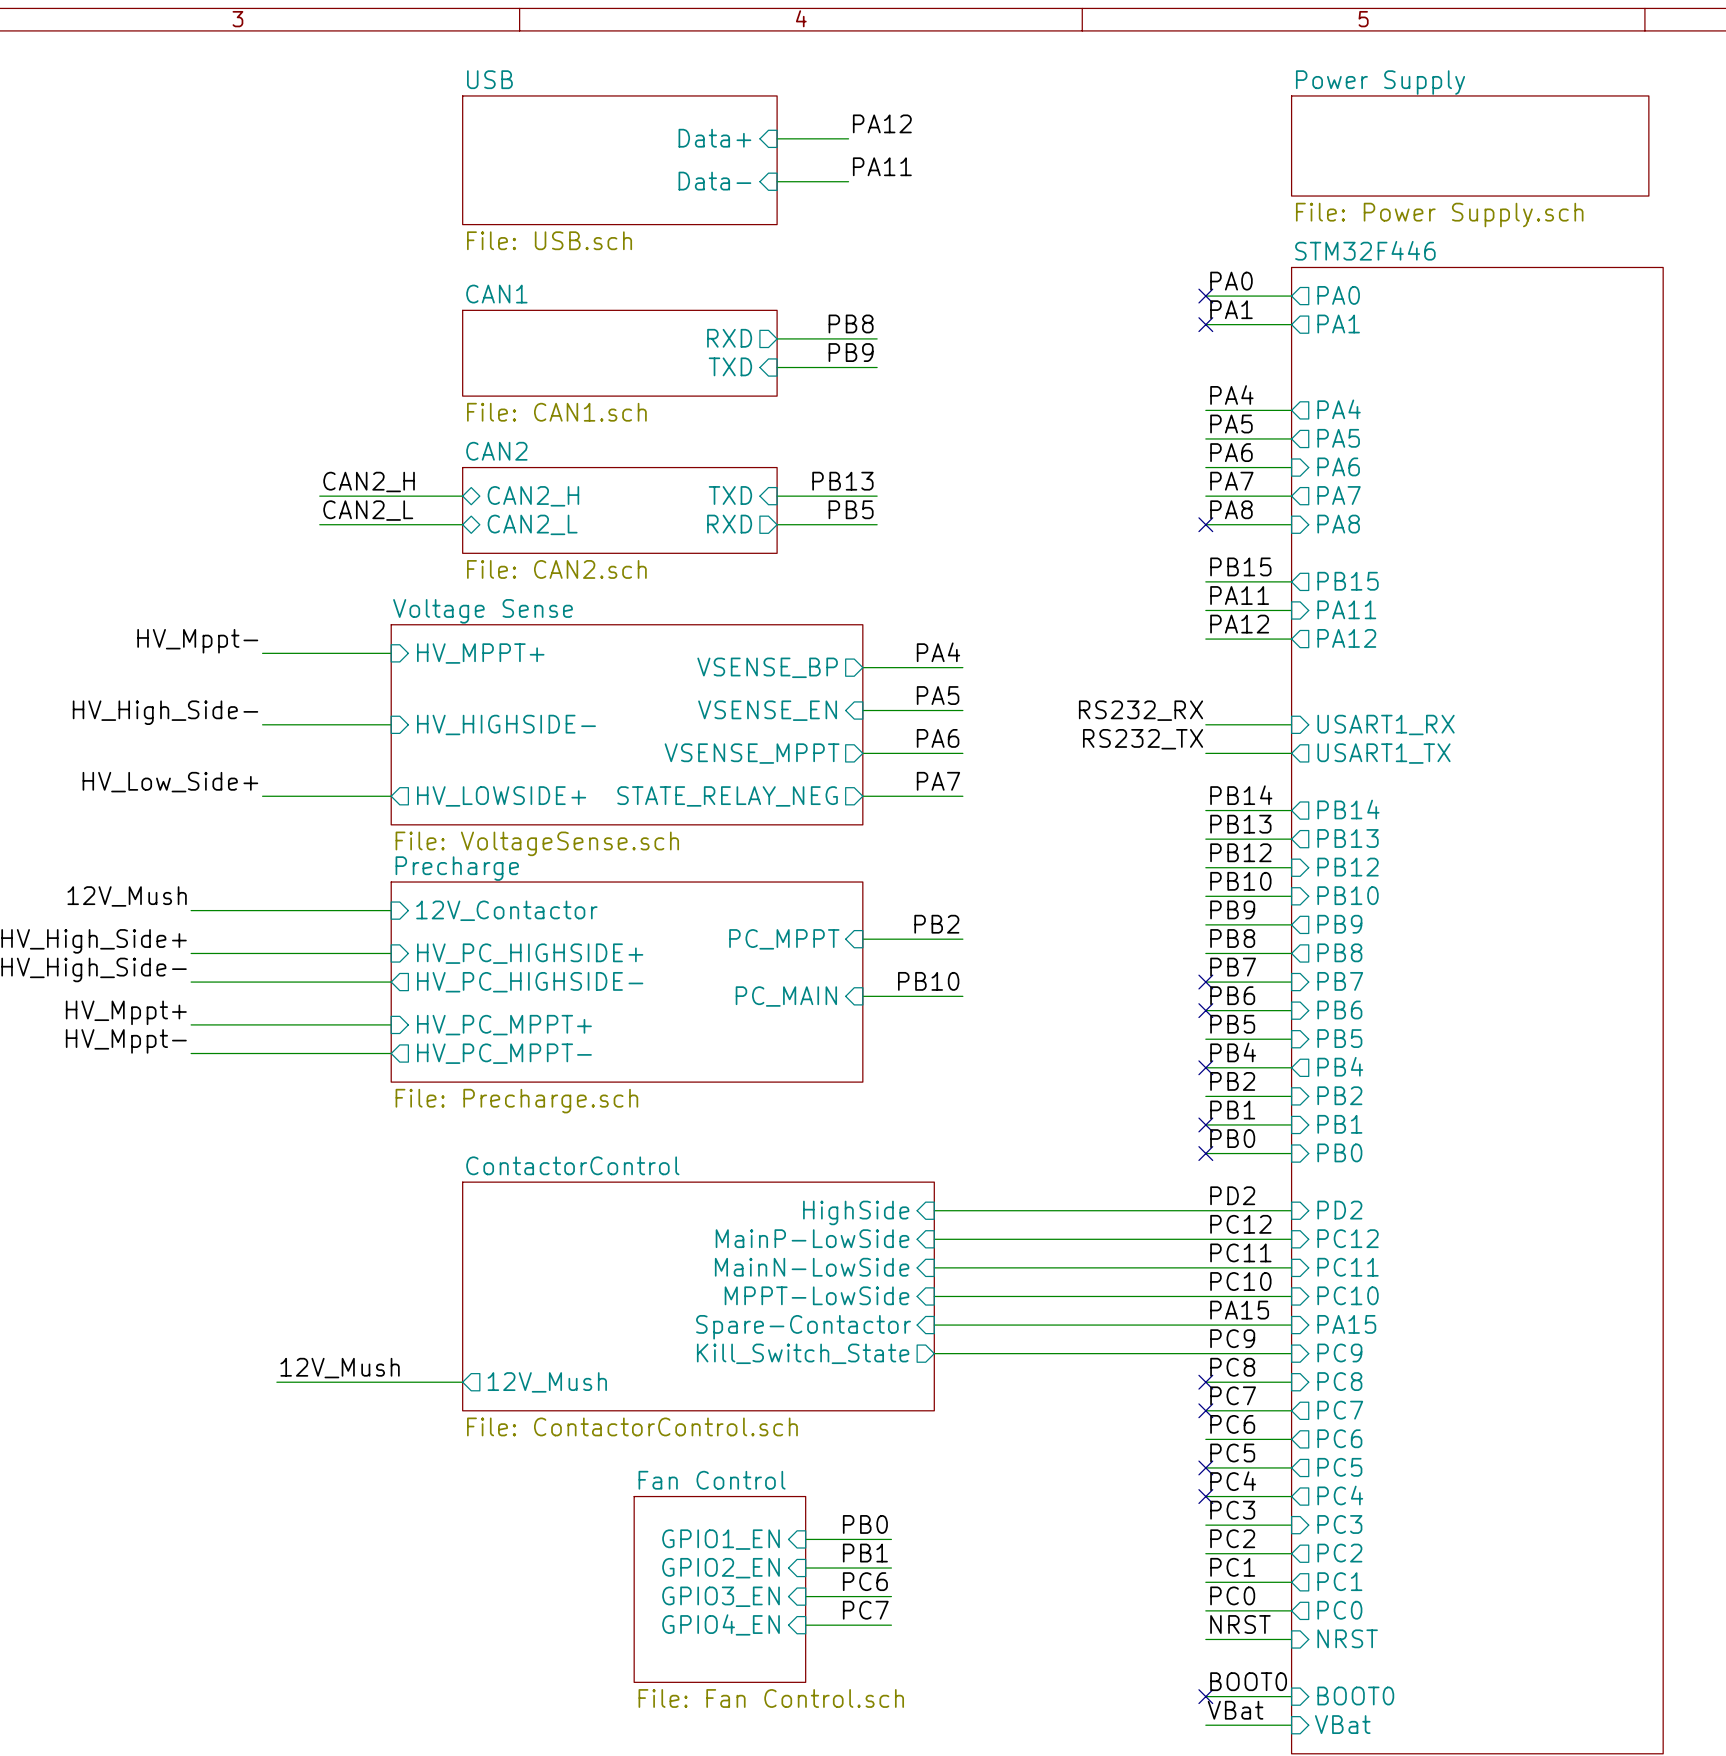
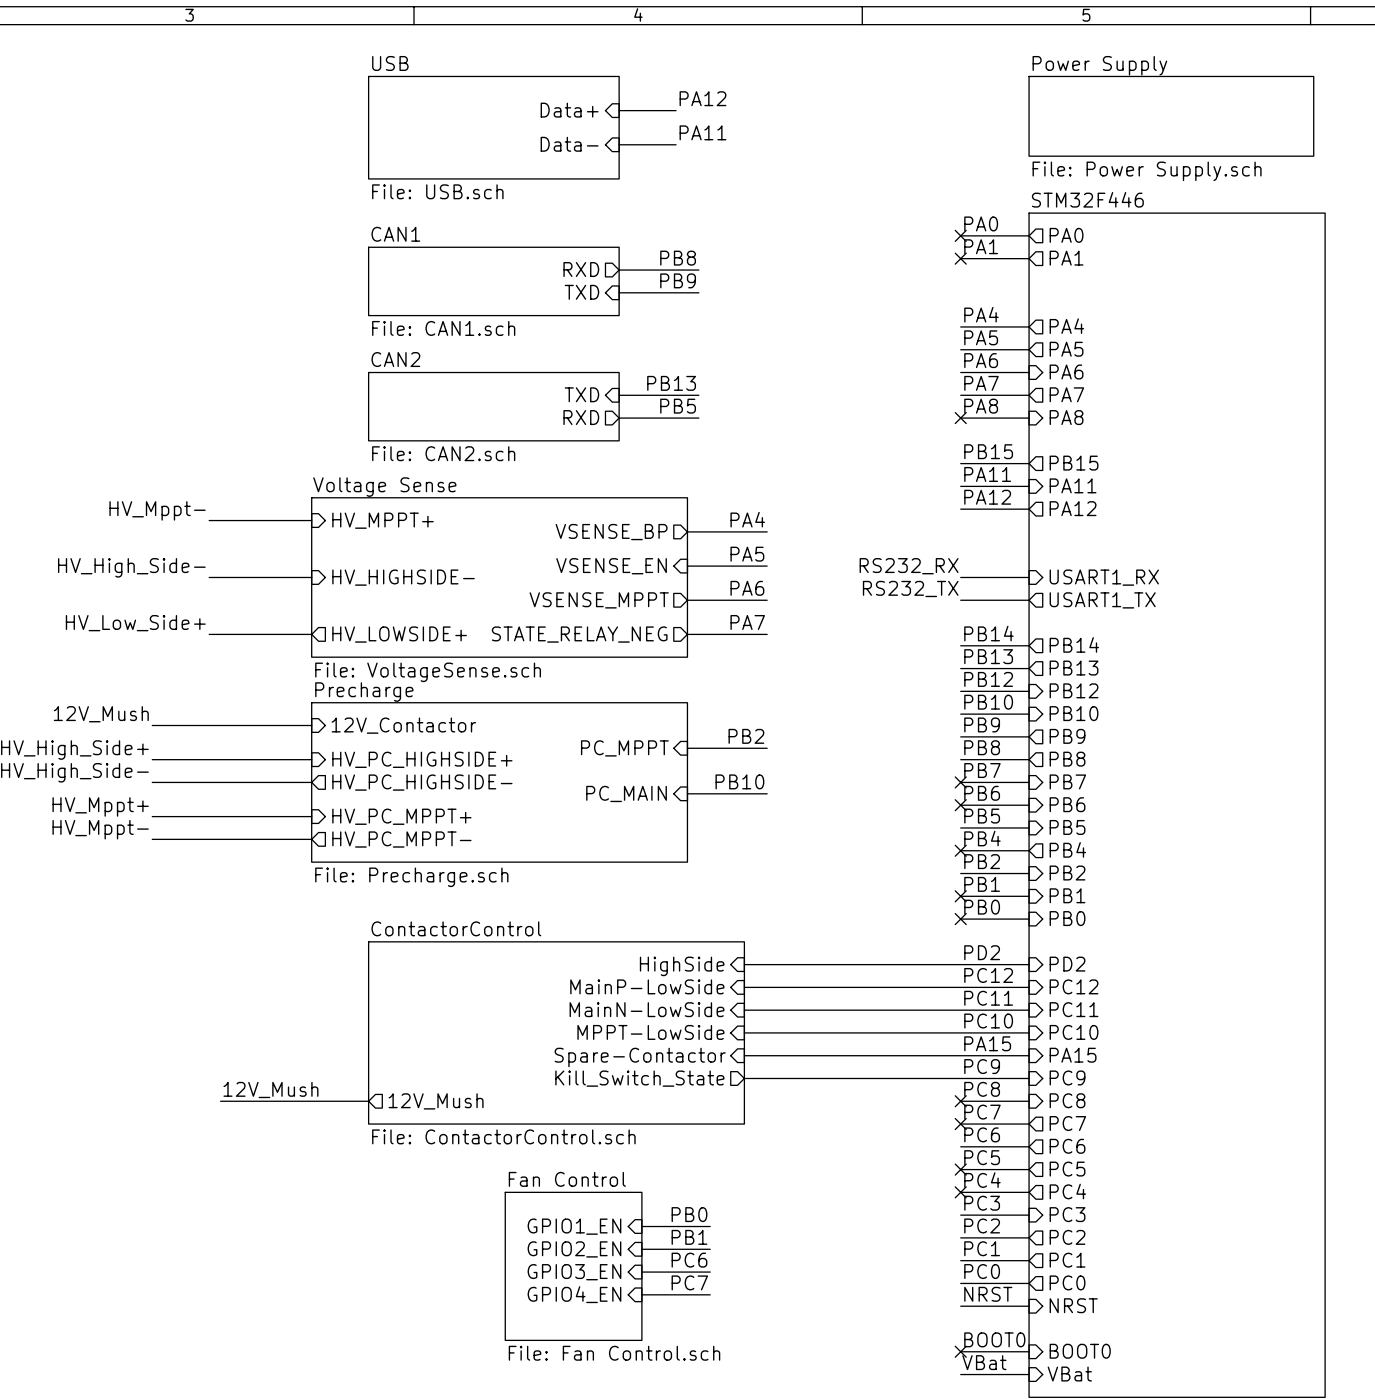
label: CAN2_H (369, 481) -> none
wire: (319, 496) (462, 496) -> none
sheet pin: CAN2_H (533, 496) -> none
label: CAN2_L (368, 510) -> none
wire: (319, 524) (462, 524) -> none
sheet pin: CAN2_L (532, 524) -> none

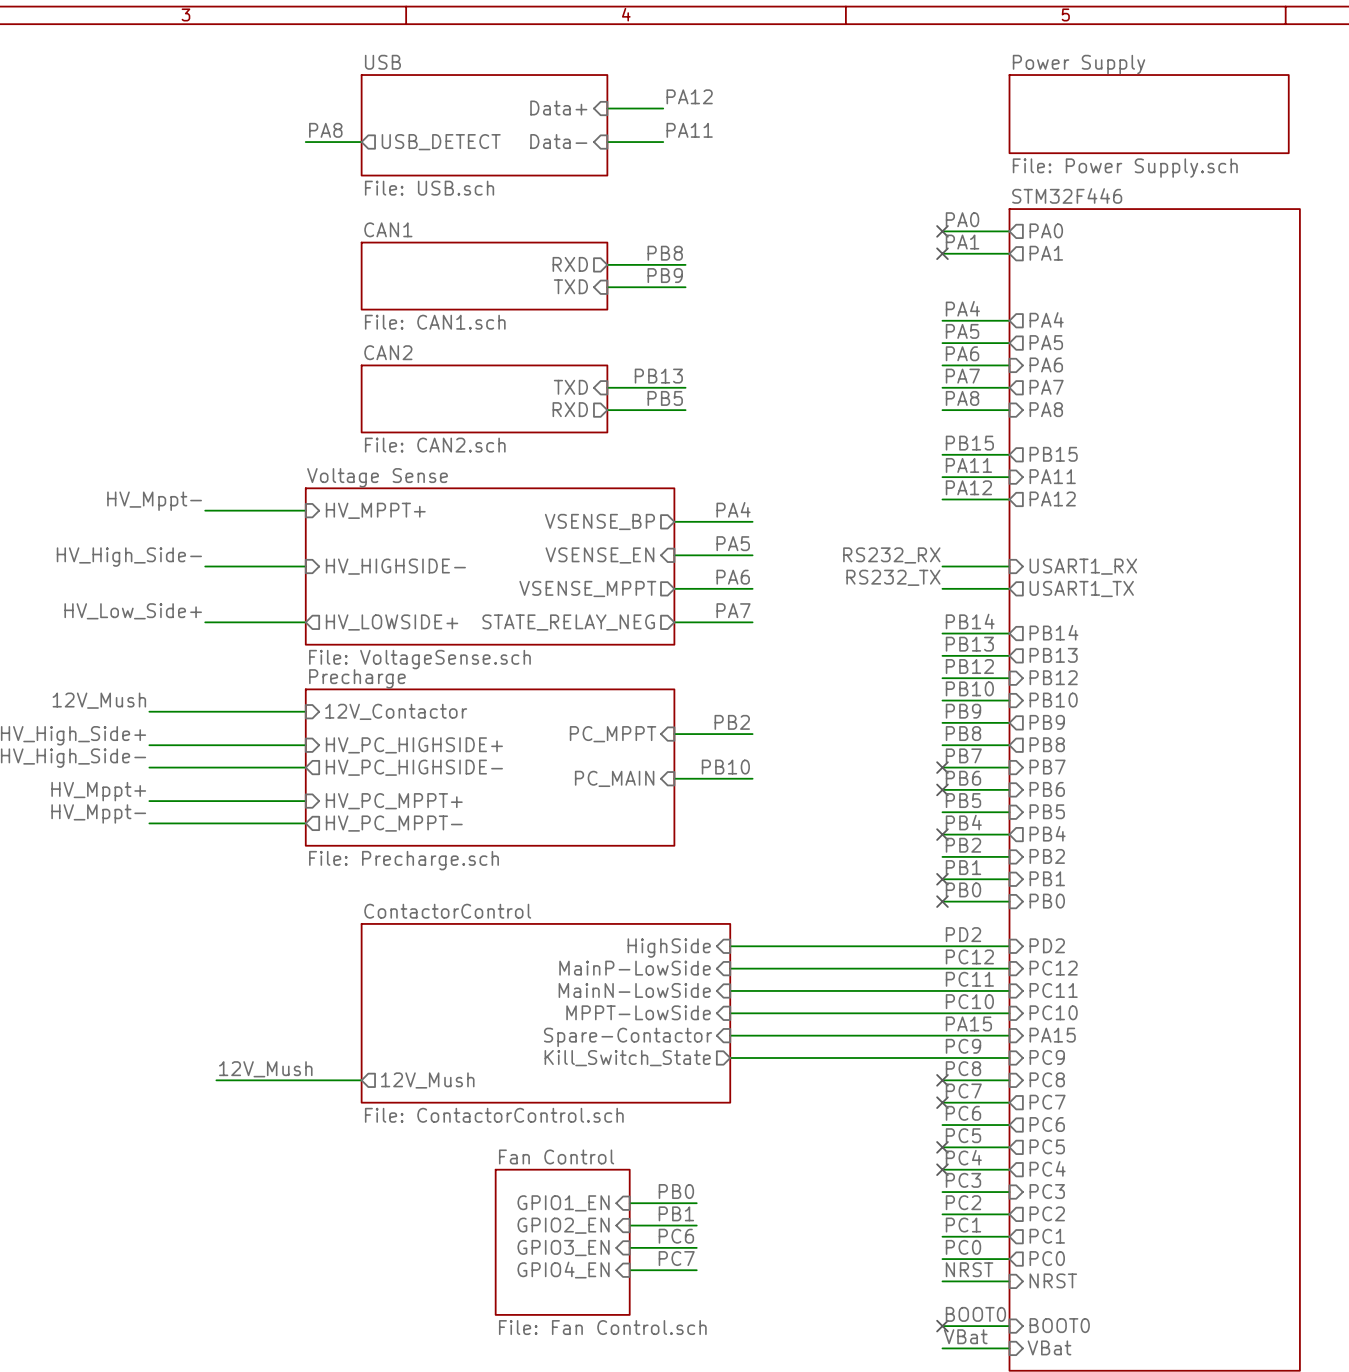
label: none -> PA8 (325, 130)
wire: none -> (305, 142) (361, 142)
sheet pin: none -> USB_DETECT (441, 142)
no-connect mark: (960, 418) -> none

